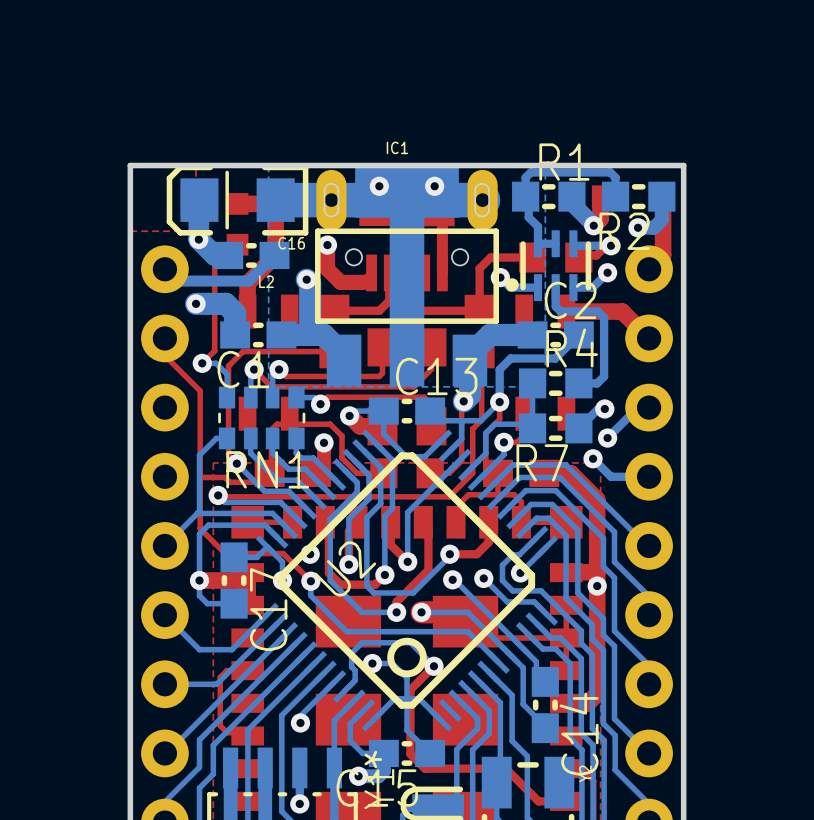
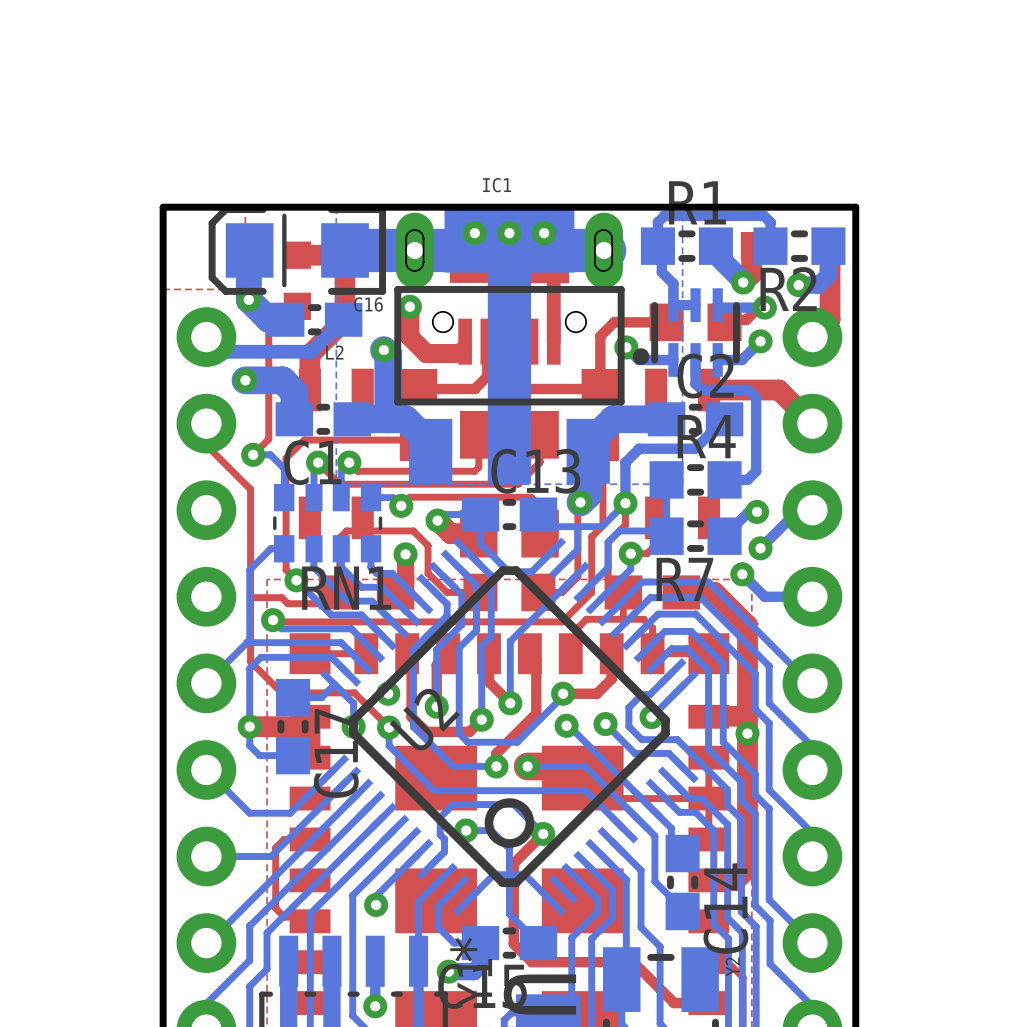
via: none -> (509, 233)

